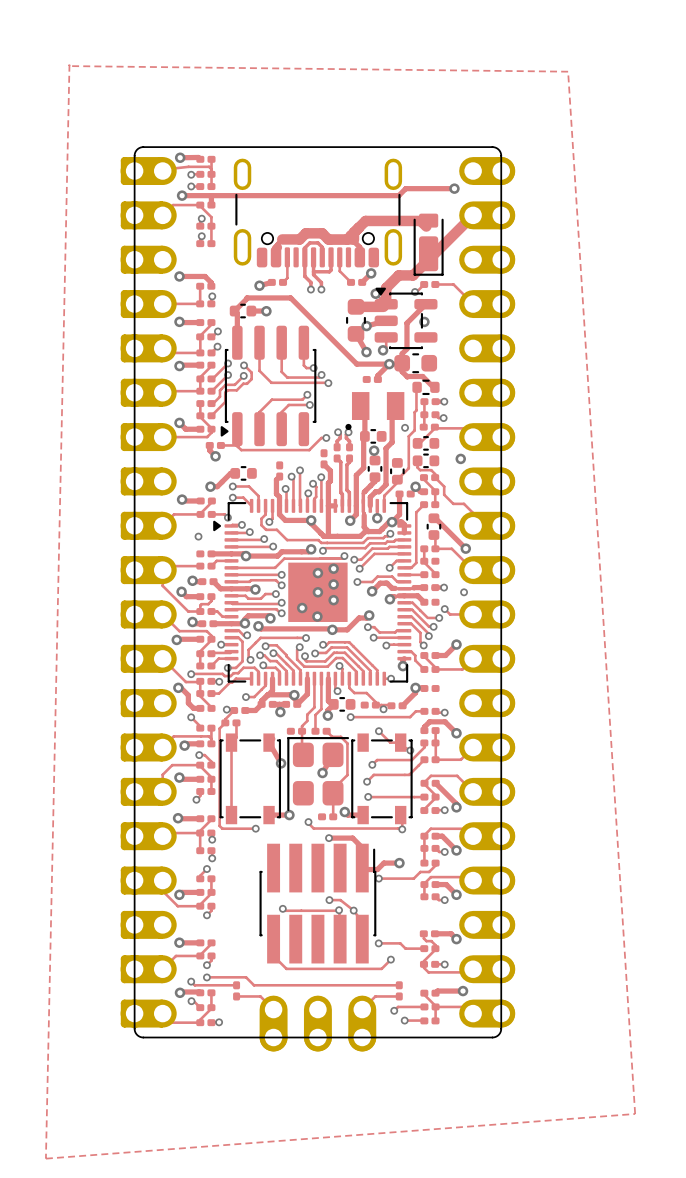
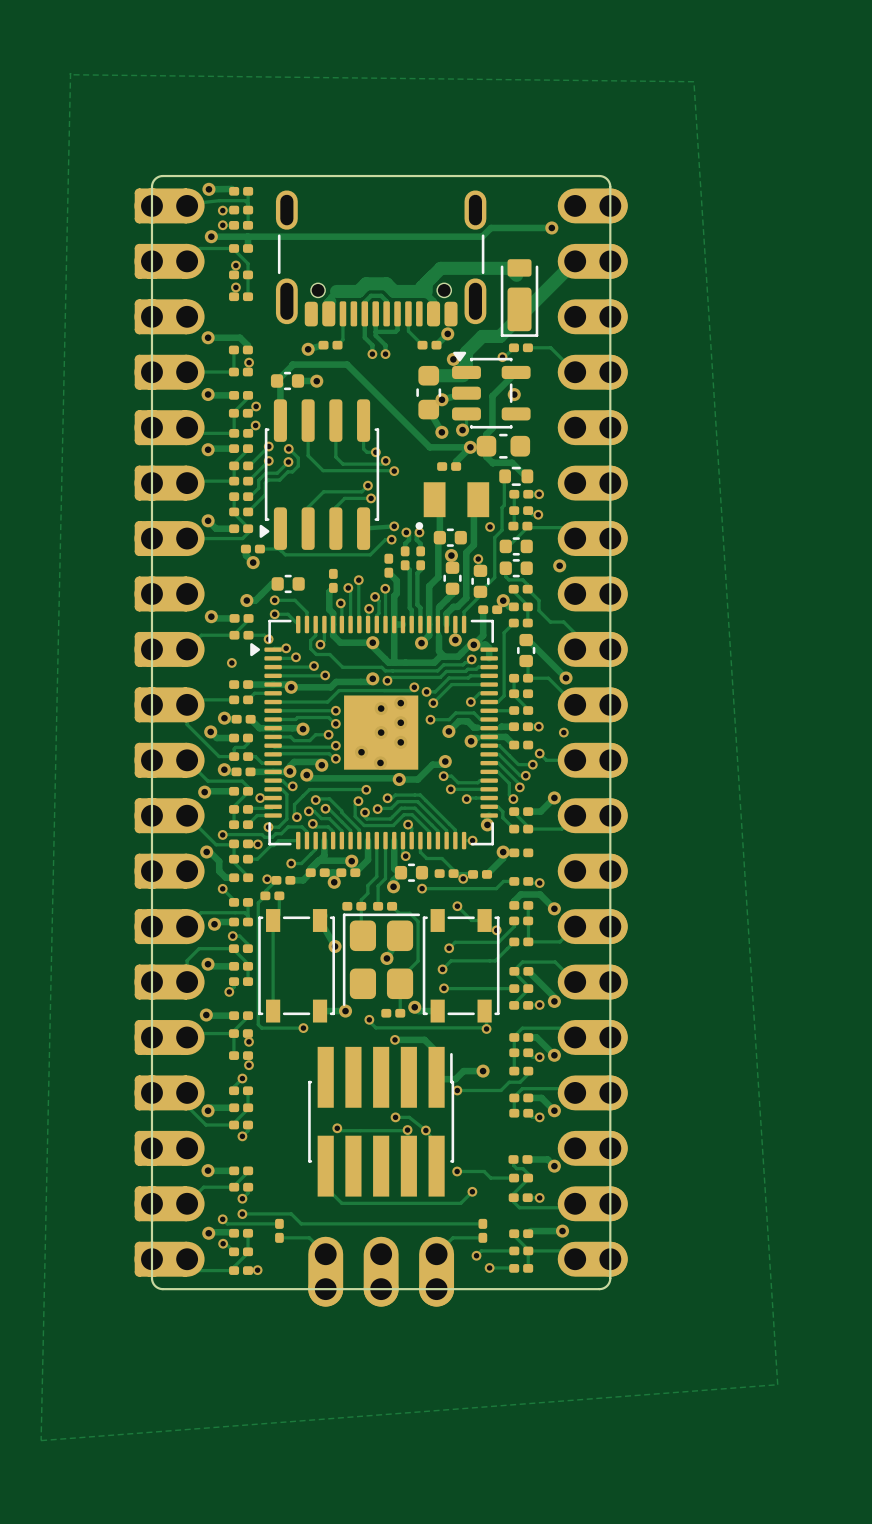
track: none -> (394, 526) (363, 528)
via: none -> (394, 526)
via: none -> (478, 559)

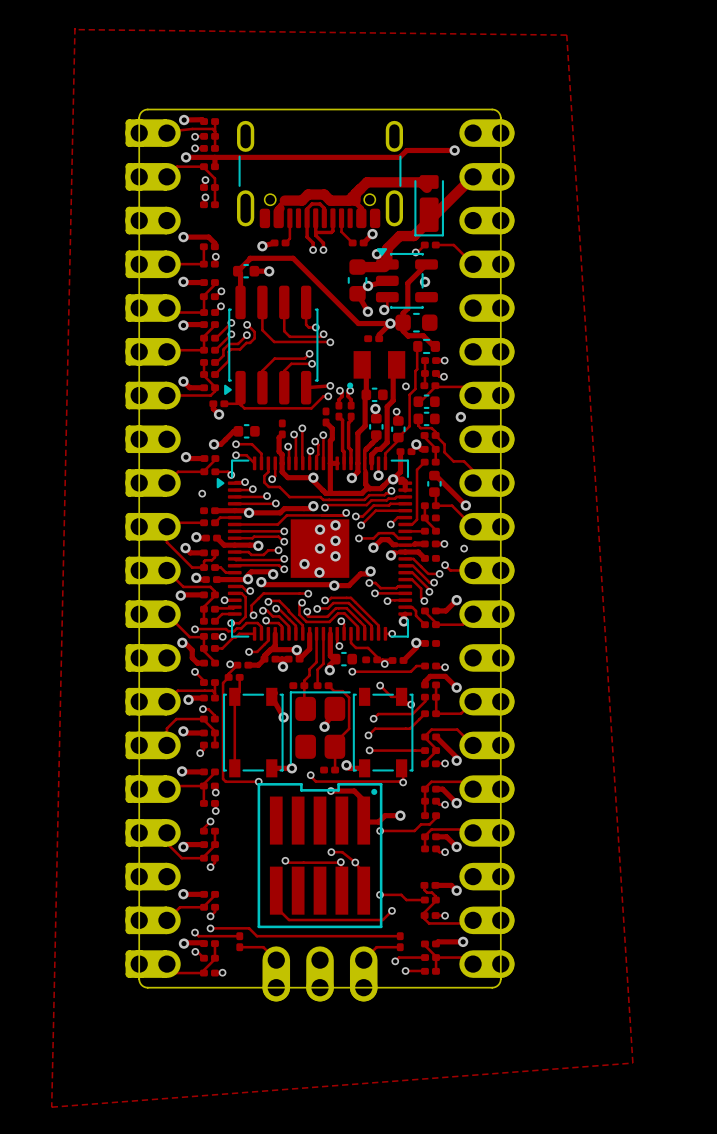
part footprint: [308, 1046, 455, 1197] -> [257, 783, 383, 929]

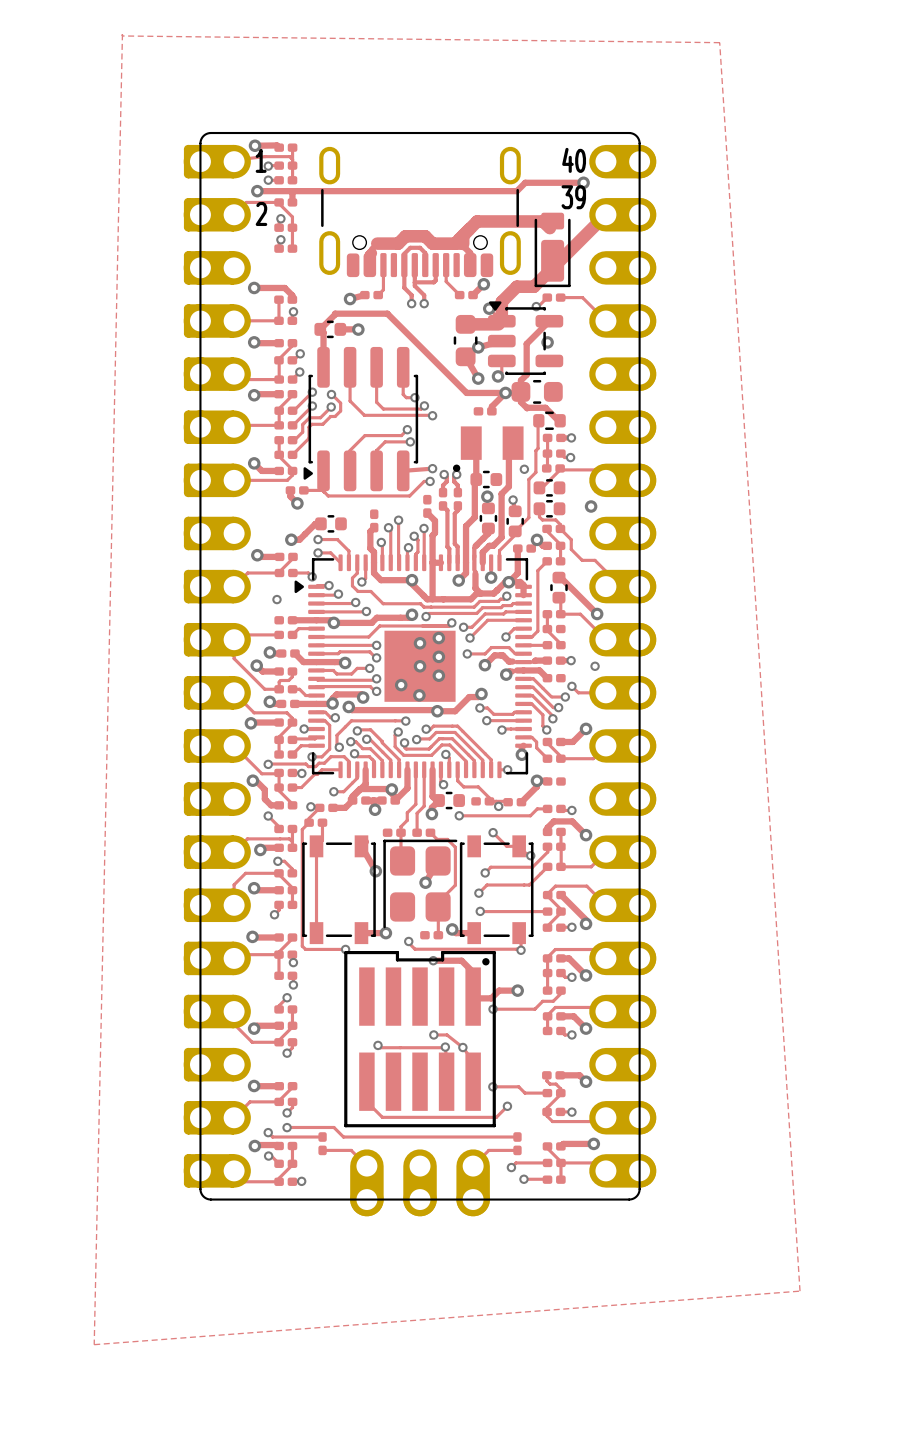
text: none -> 1 (261, 160)
text: none -> 40 (574, 160)
text: none -> 39 (573, 197)
text: none -> 2 (261, 213)

